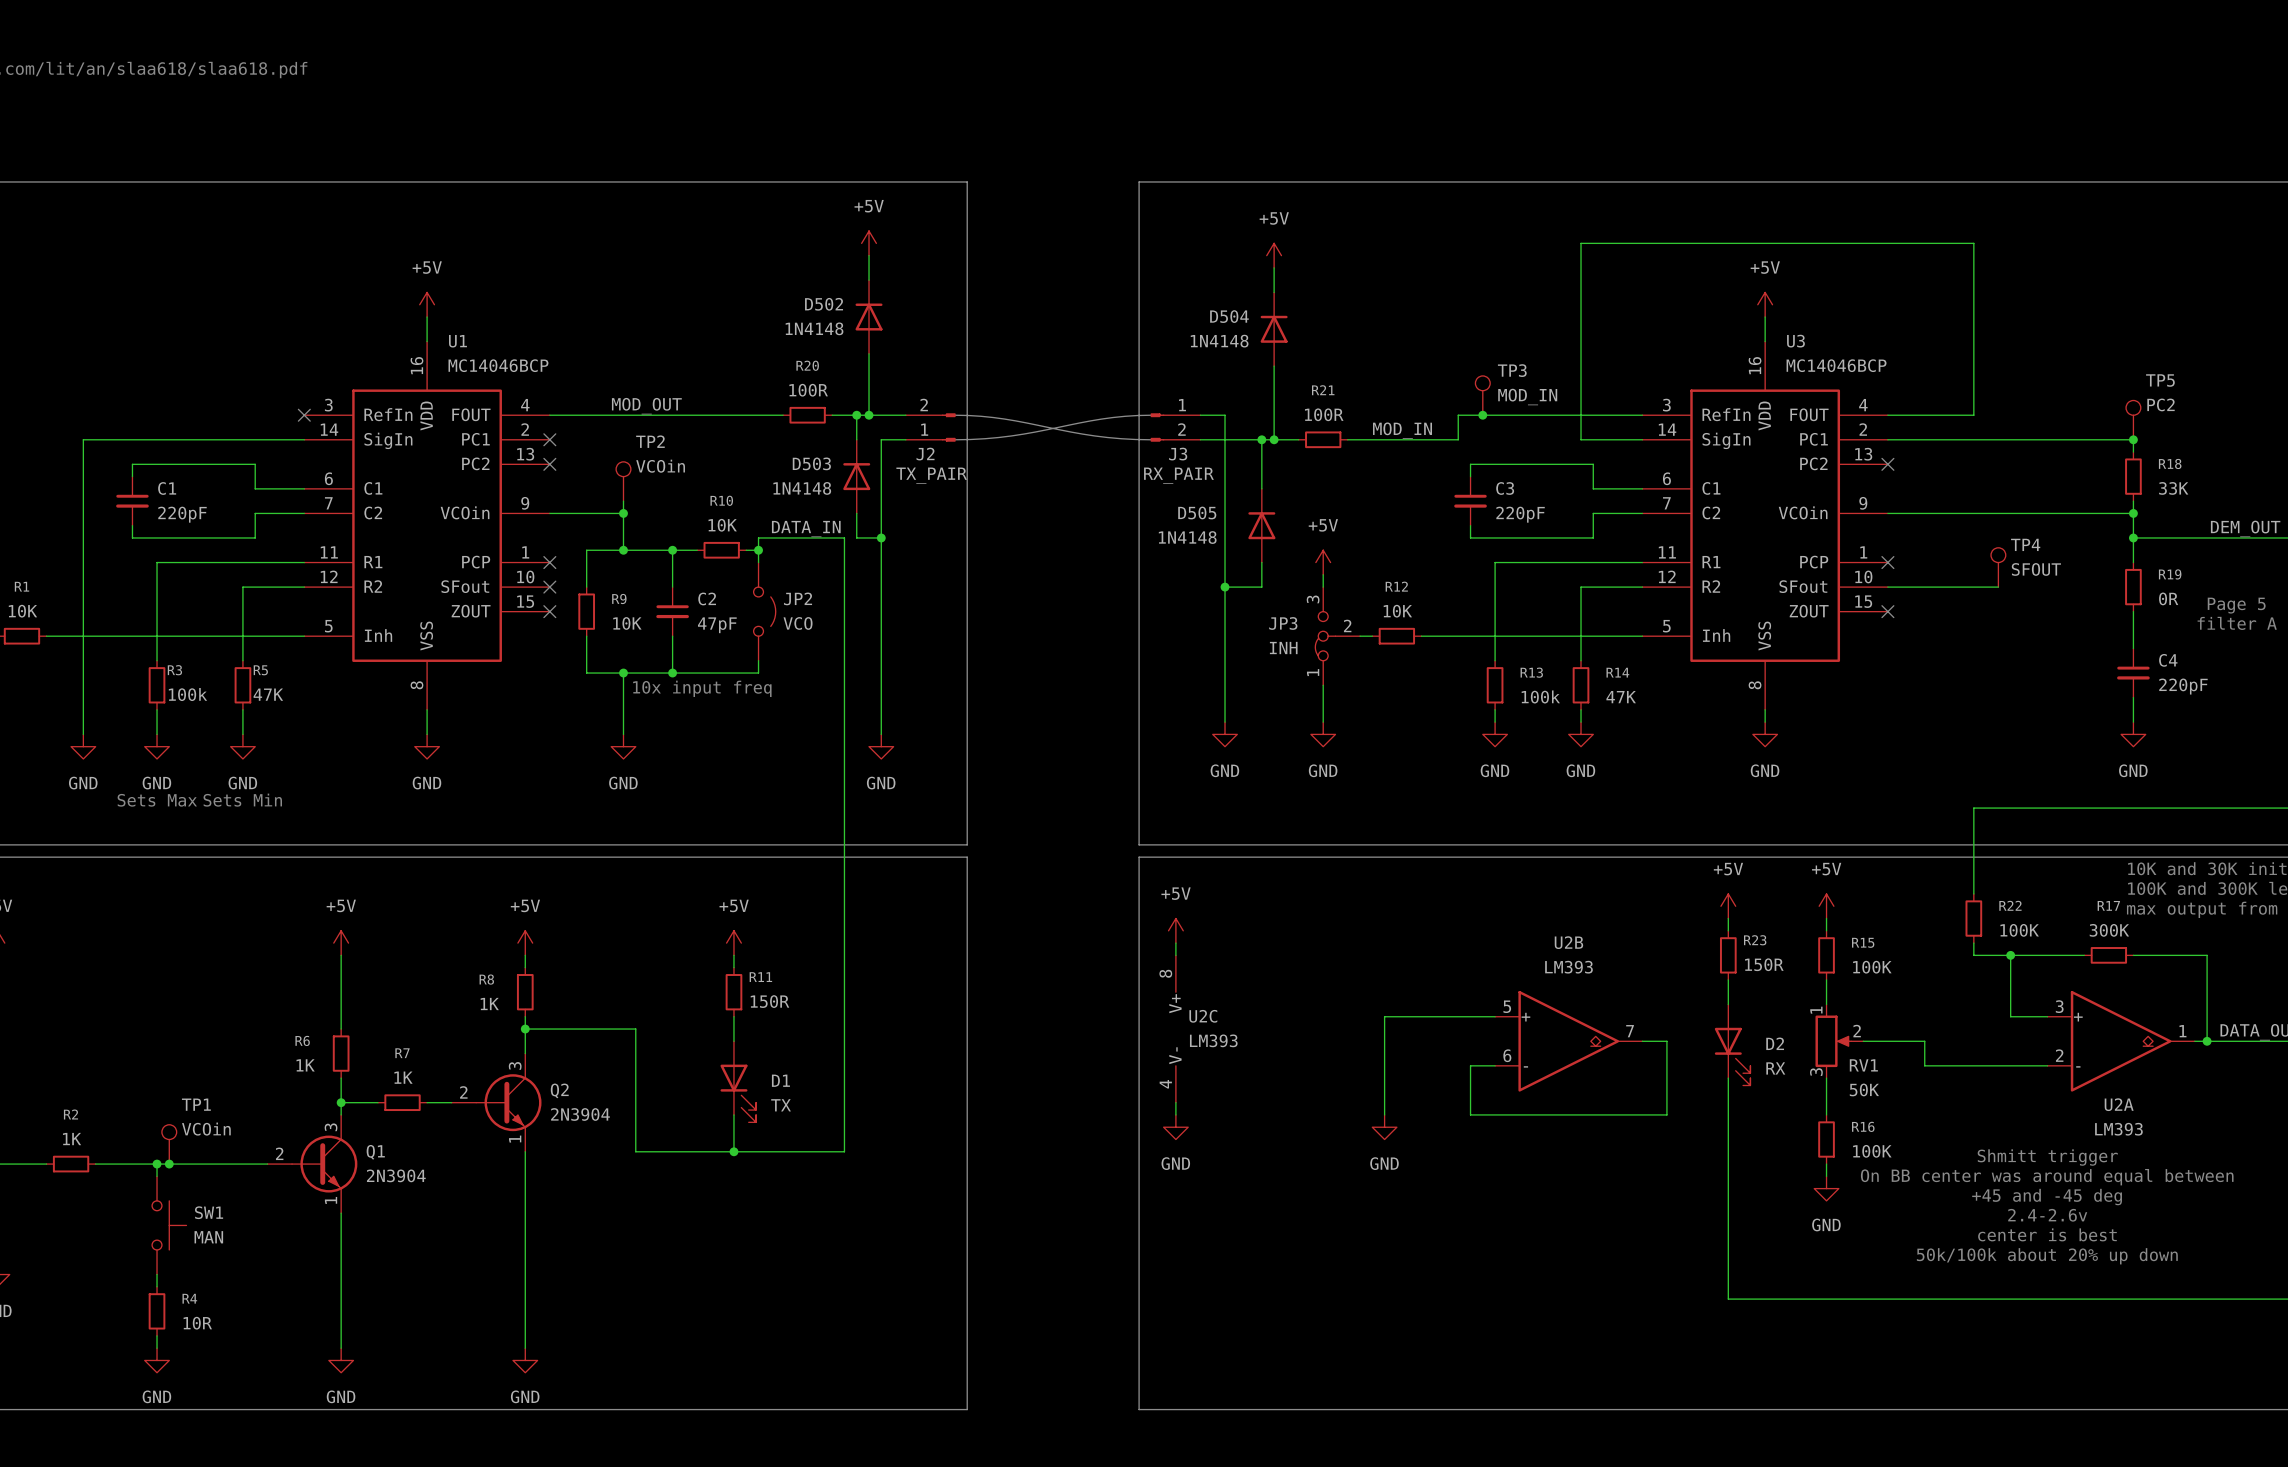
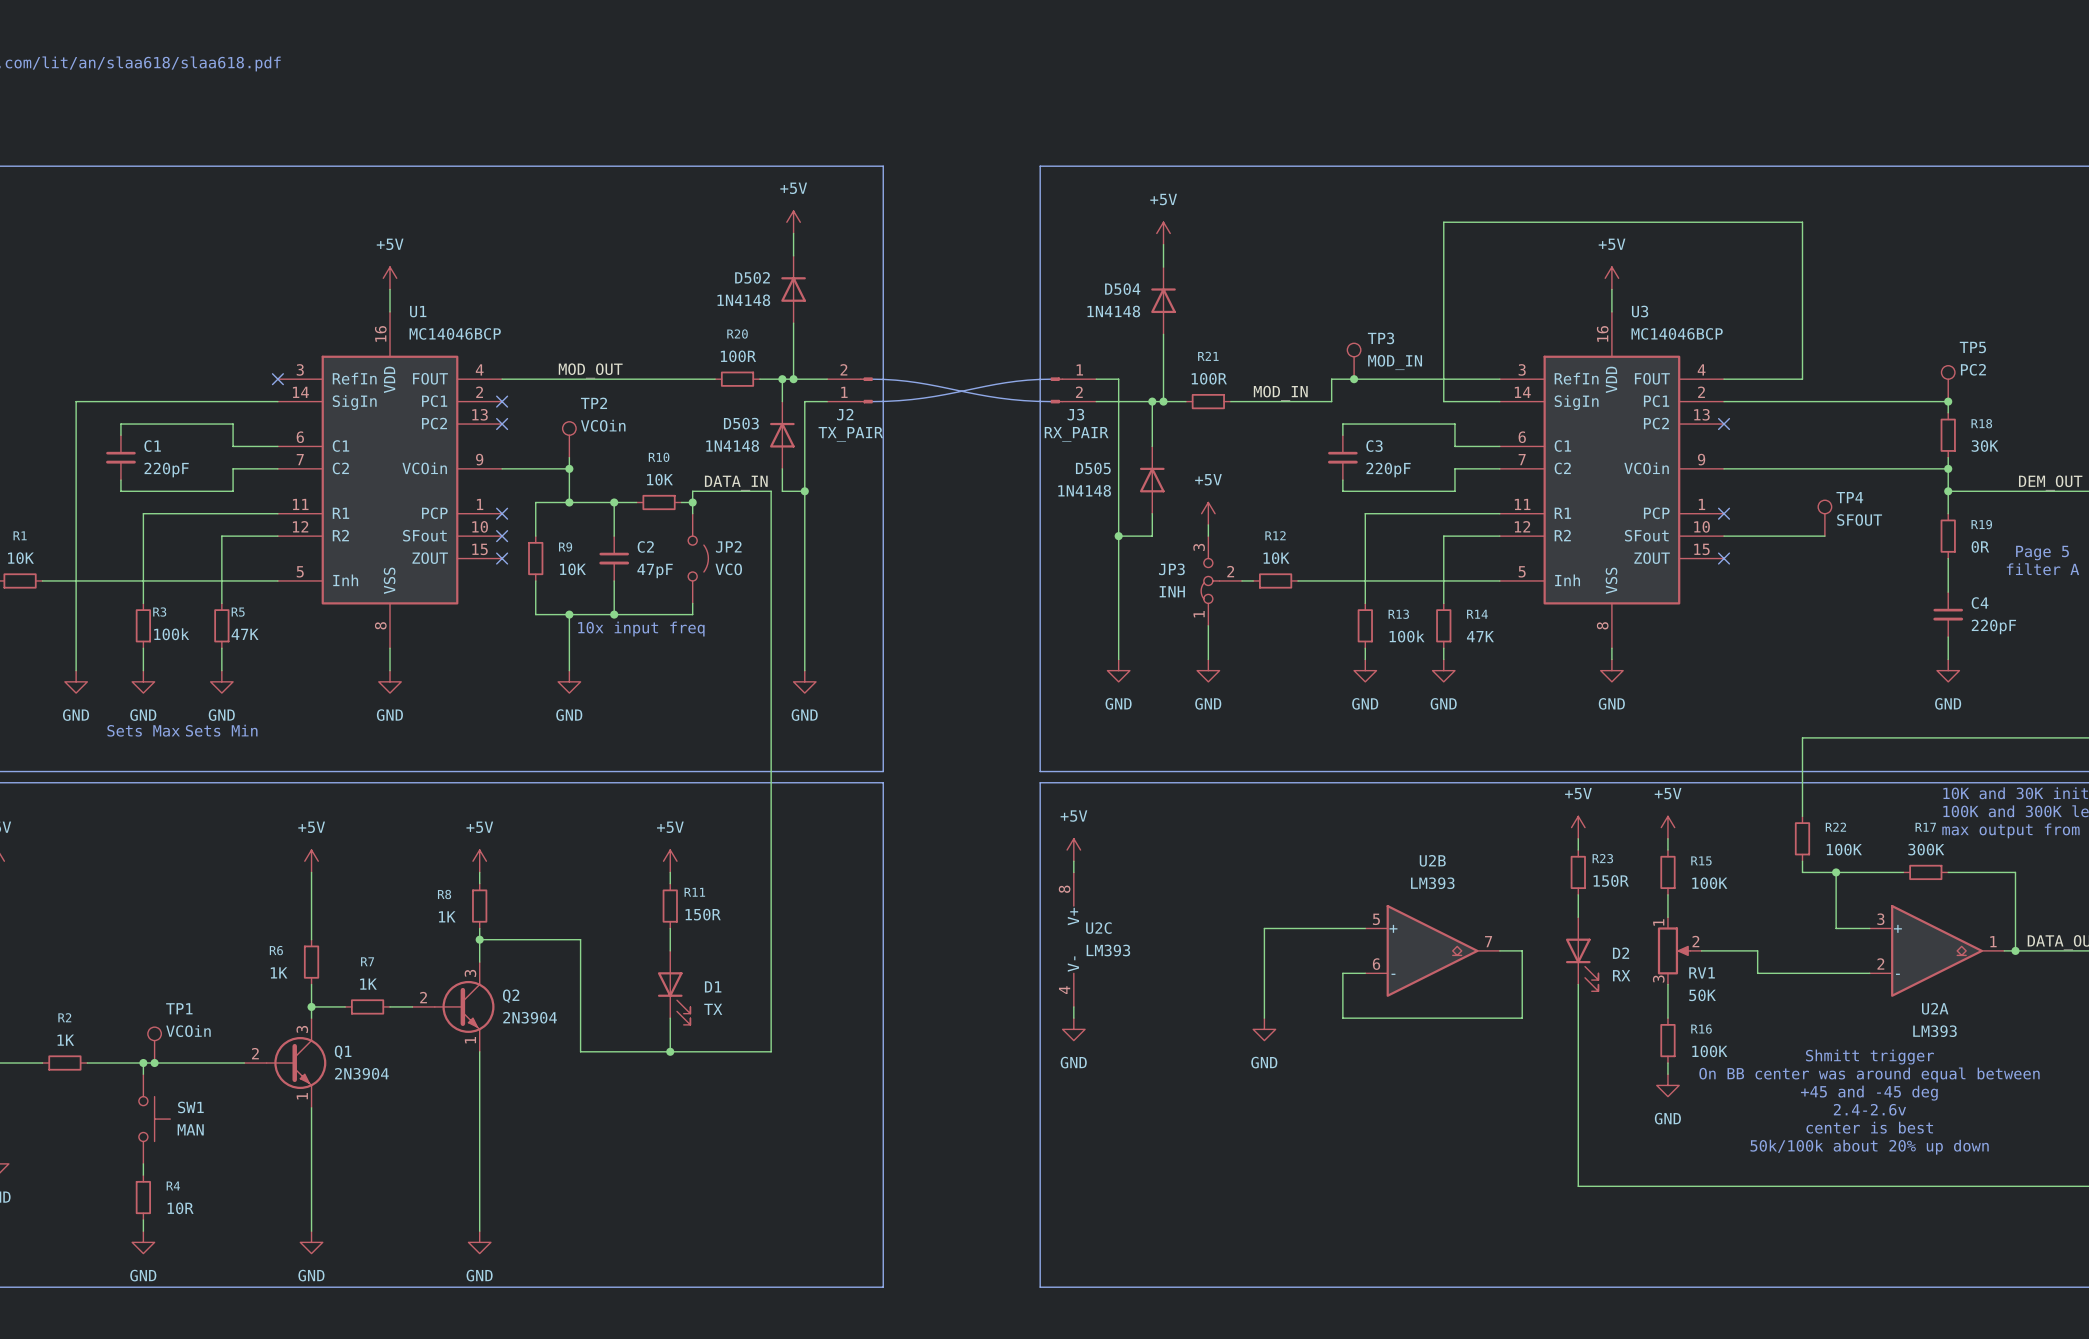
R18 value: 33K (2173, 488) -> 30K (1985, 446)

